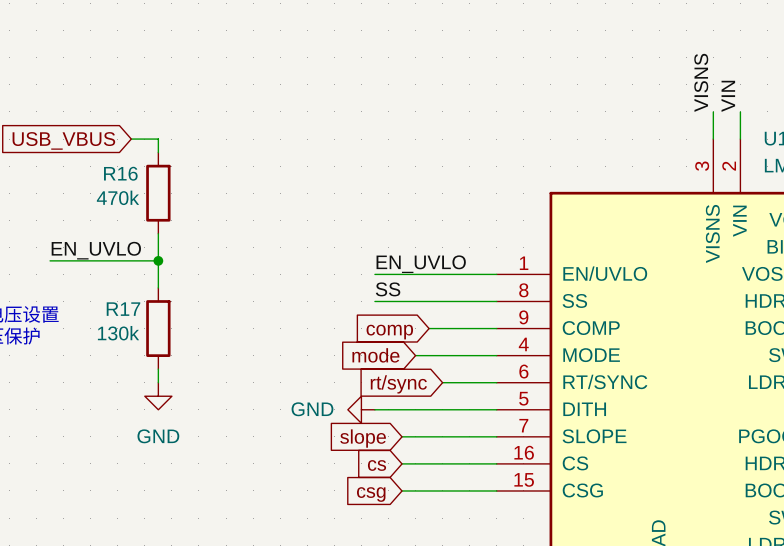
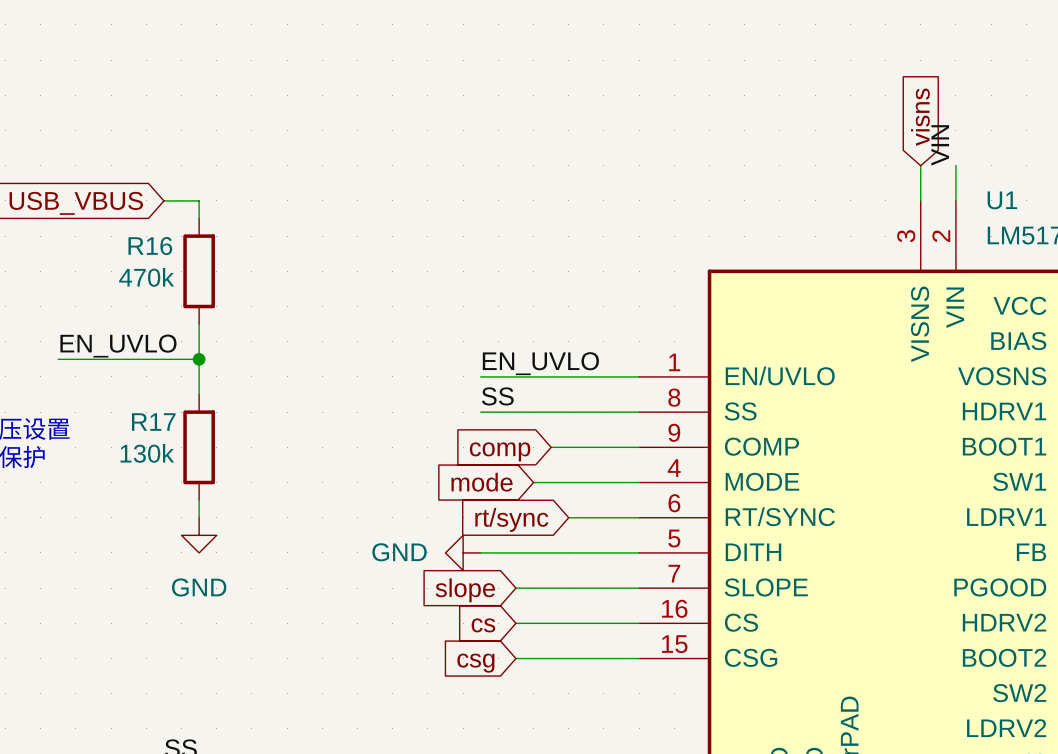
global label: none -> visns (920, 117)
label: VISNS (701, 82) -> none

